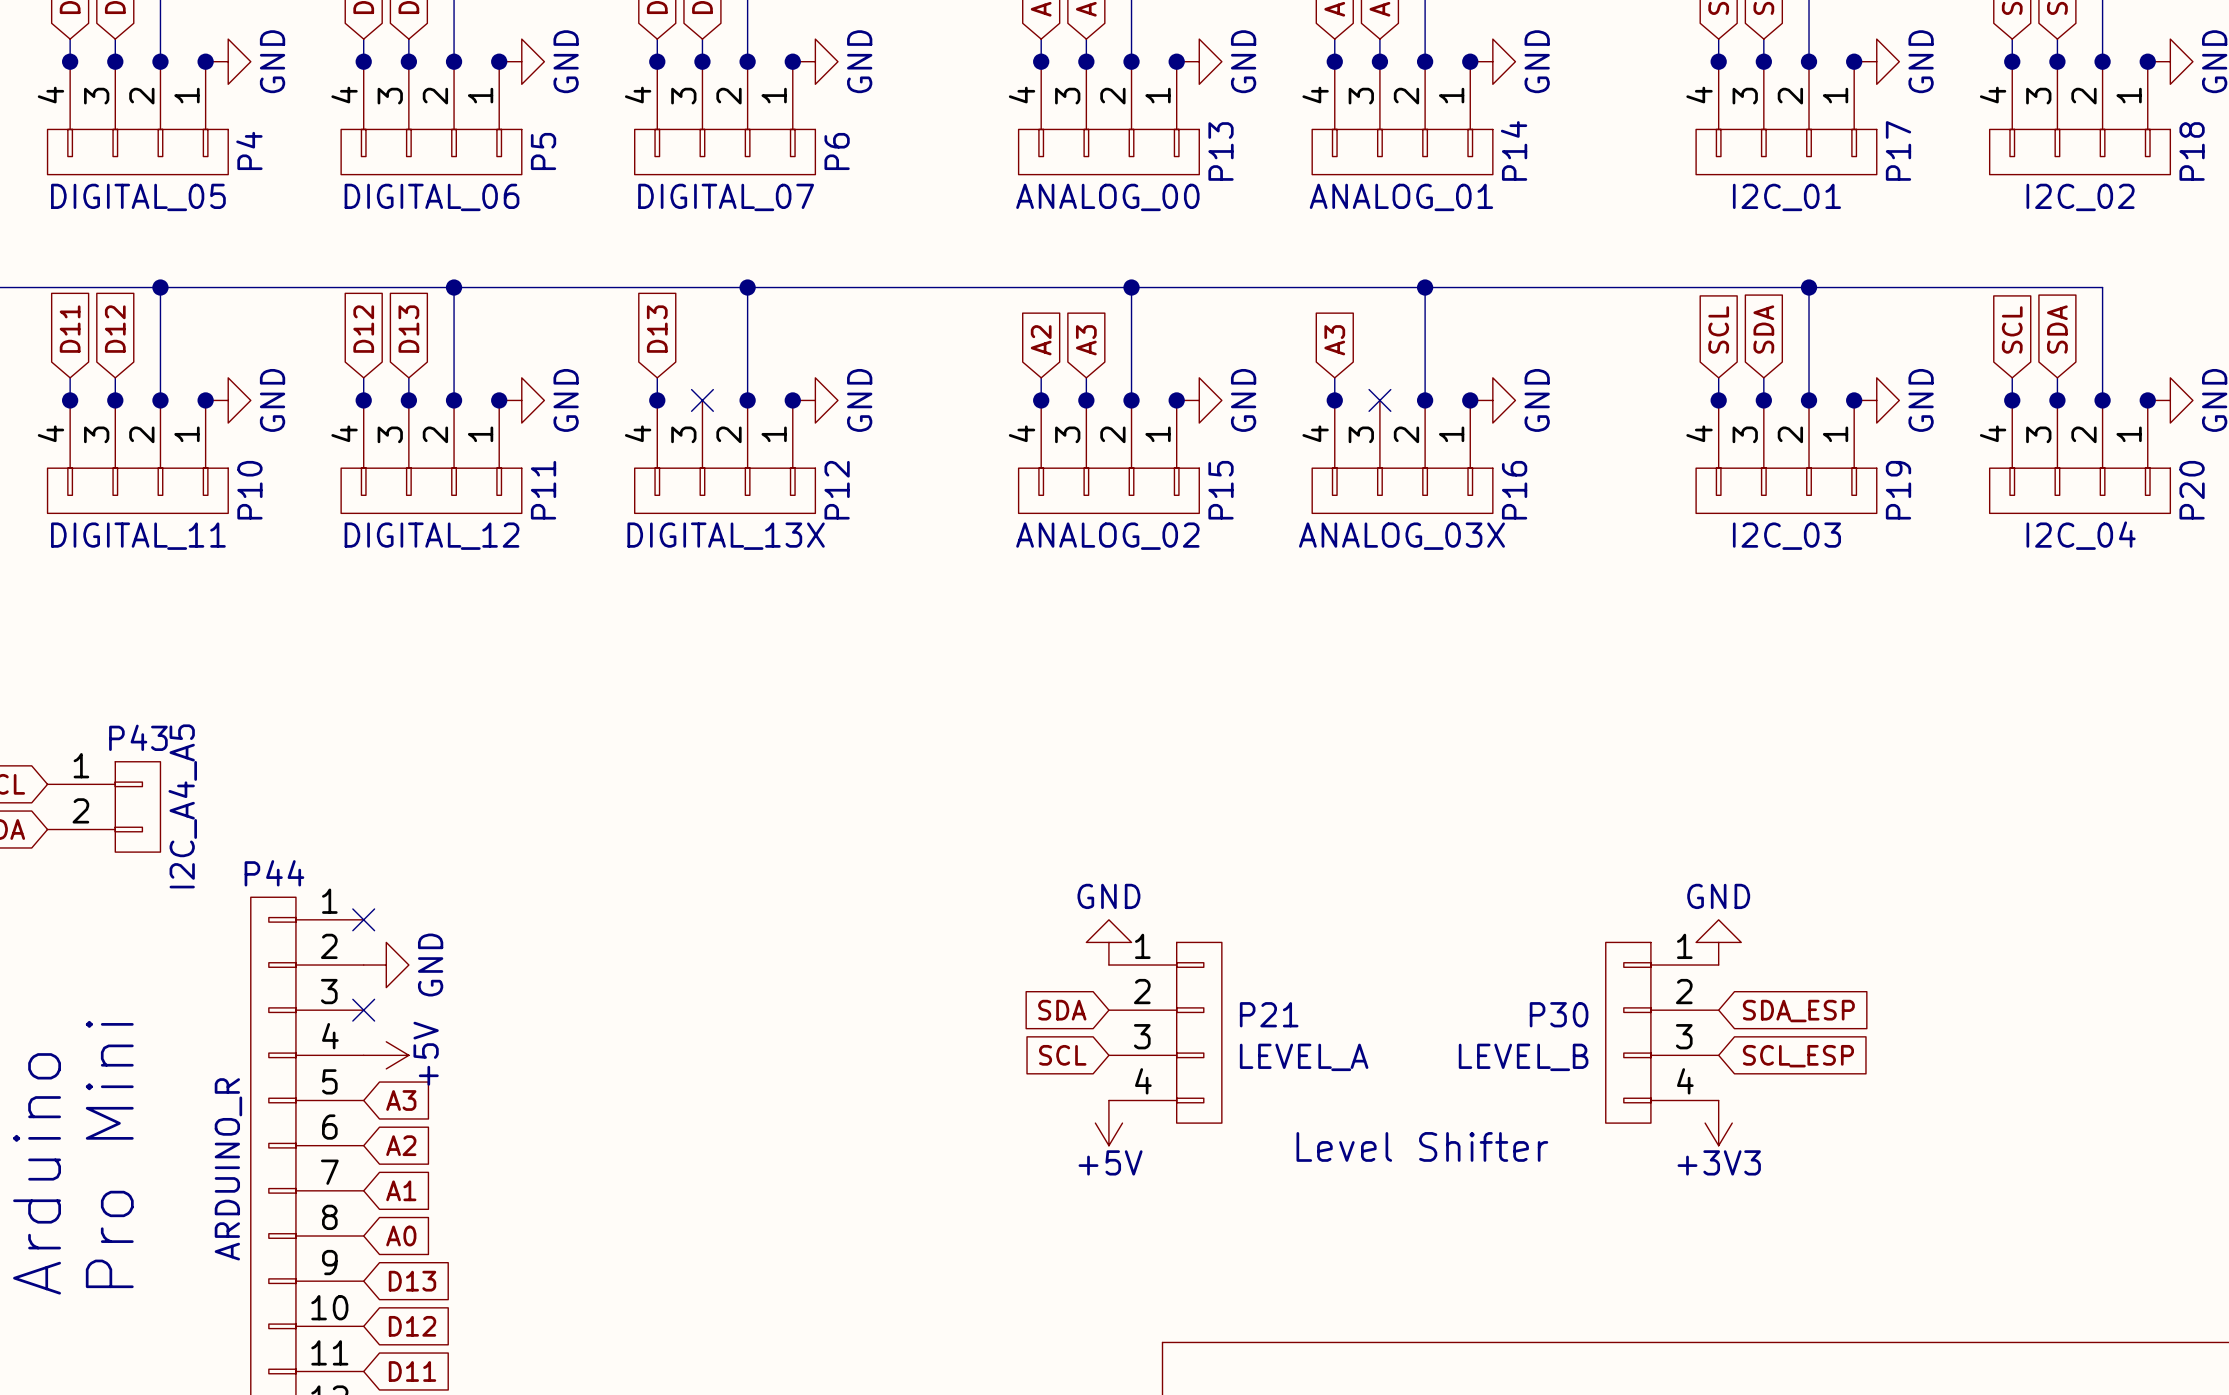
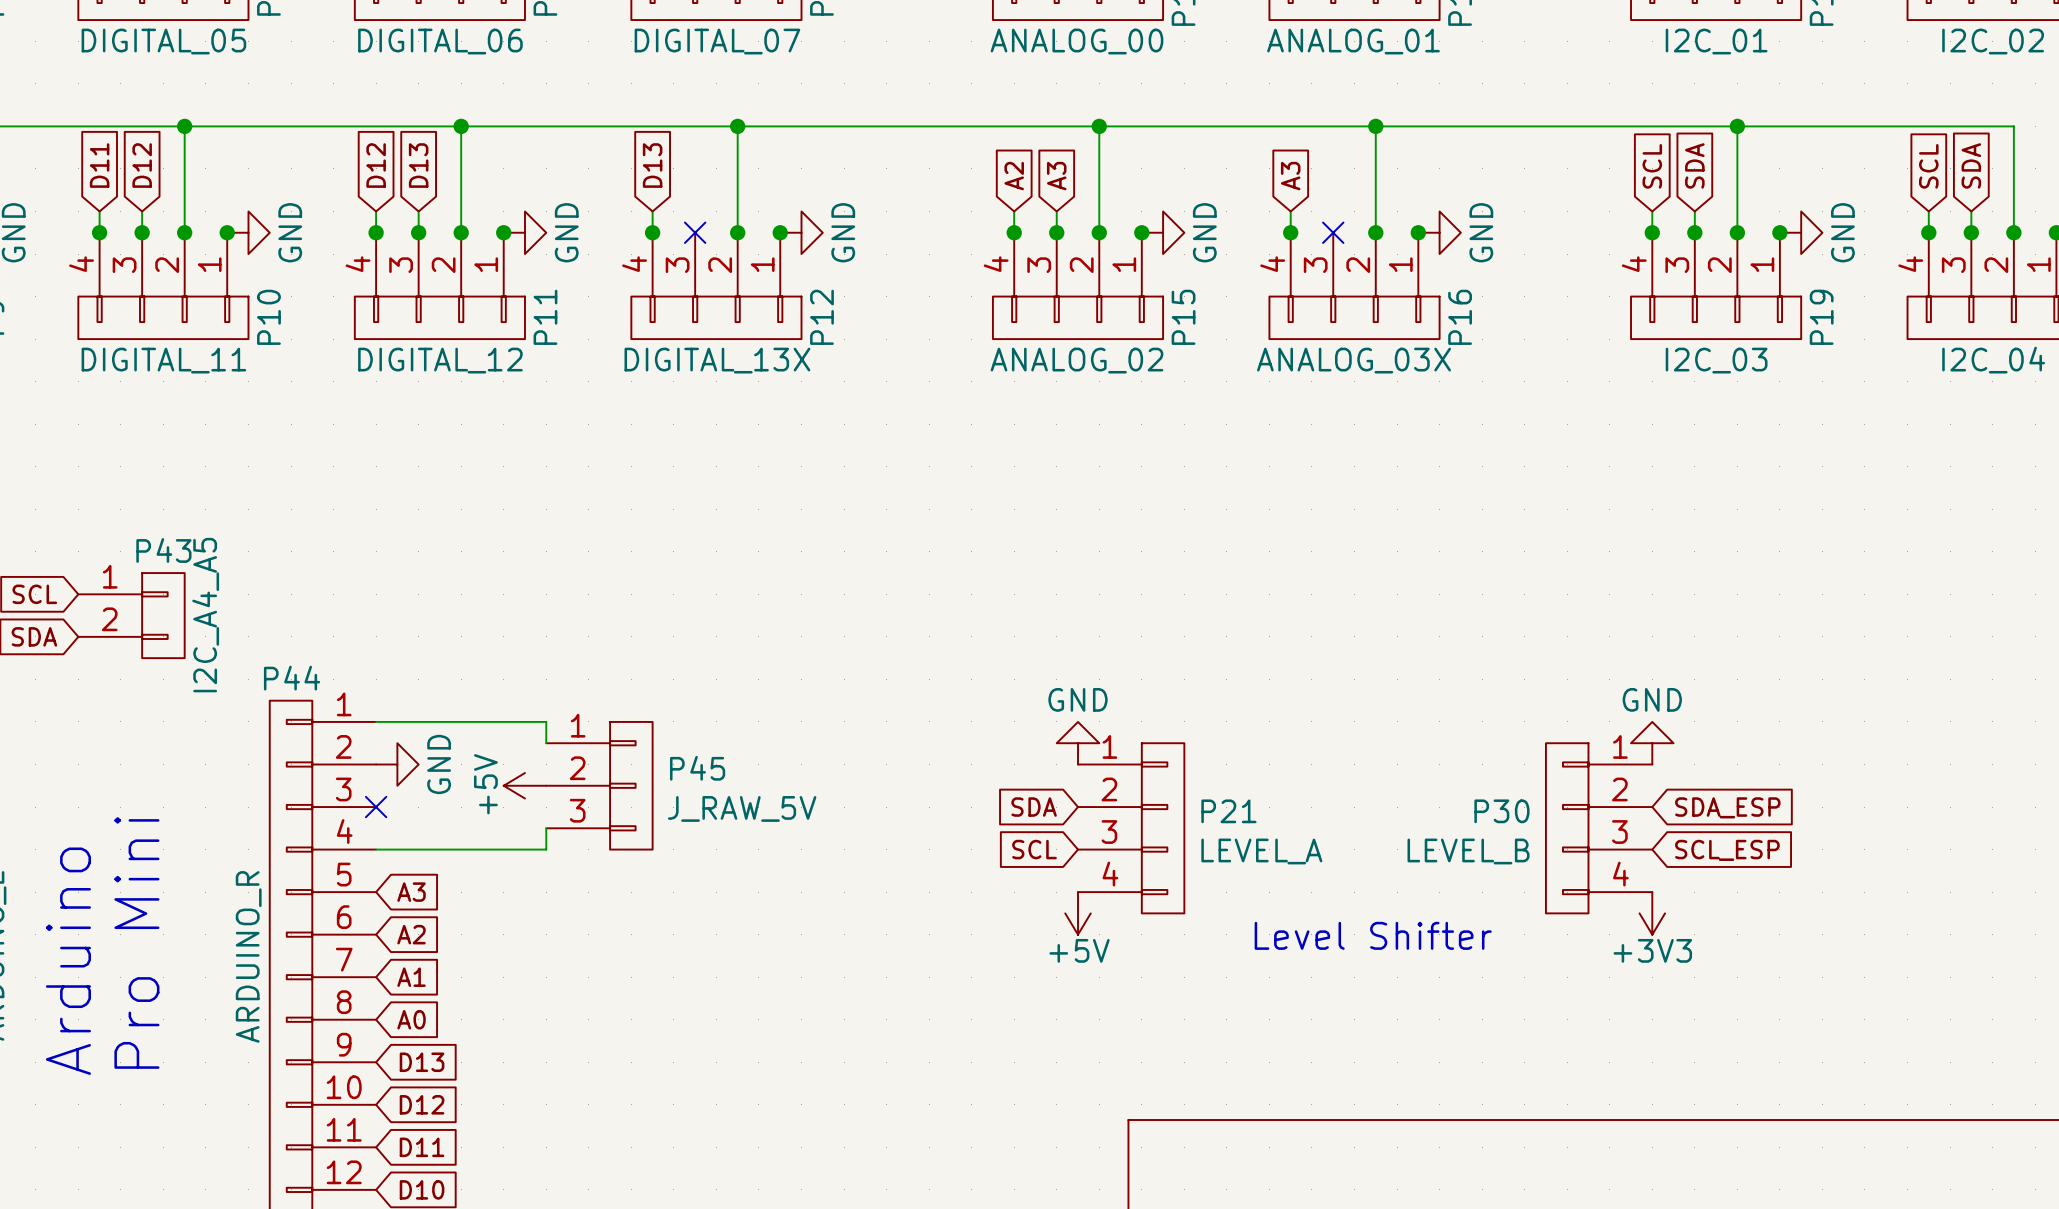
wire: none -> (376, 721) (546, 721) (546, 743)
no-connect mark: (363, 919) -> none
P45: none -> J_RAW_5V (599, 785)
wire: none -> (546, 828) (546, 849) (376, 849)
power symbol rotation: 0° (386, 1055) -> 180° (524, 785)
power symbol position: +5V (386, 1055) -> +5V (524, 785)

